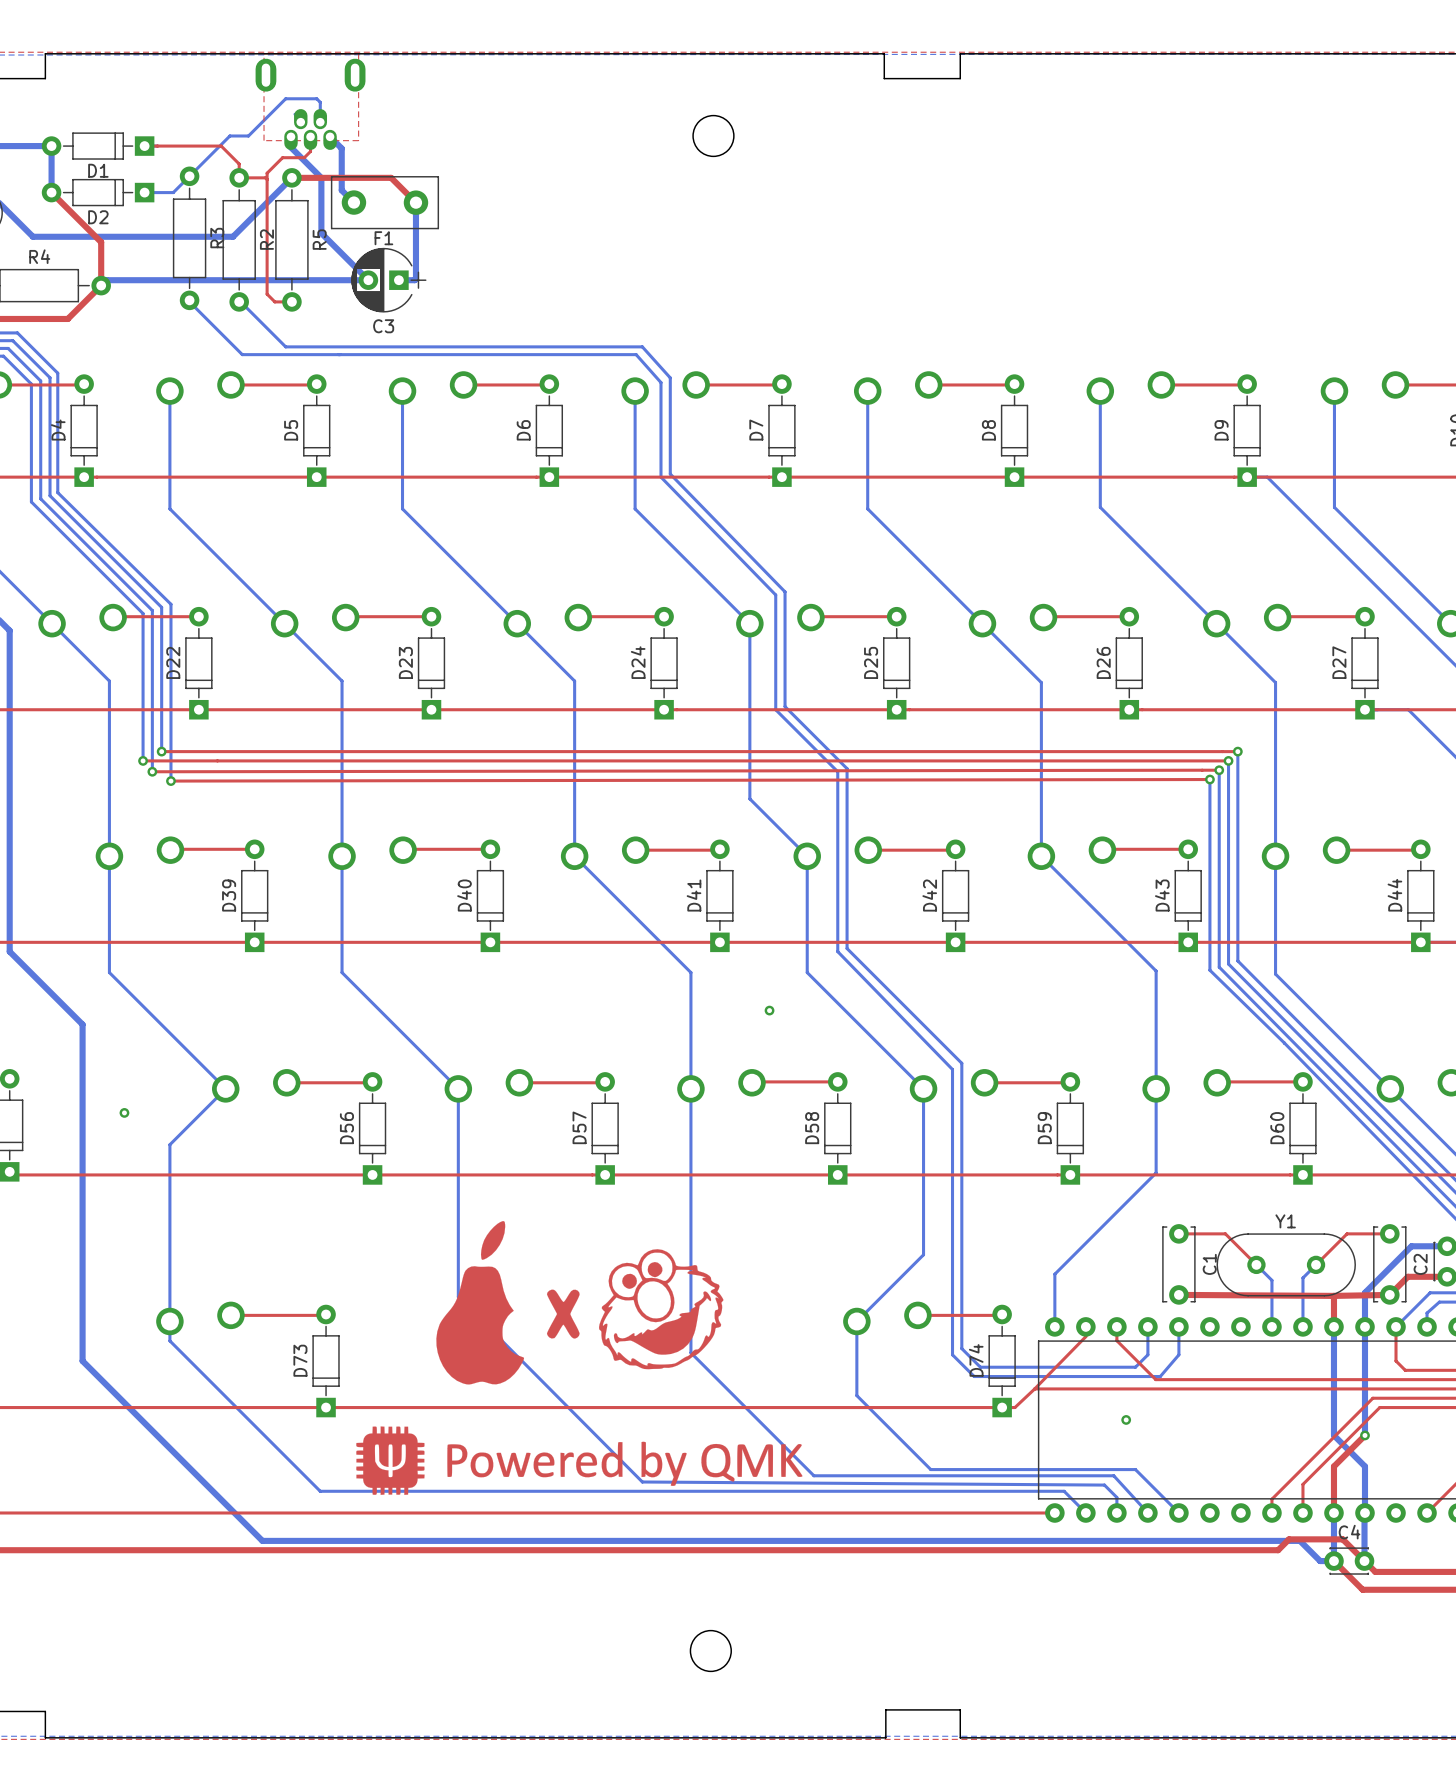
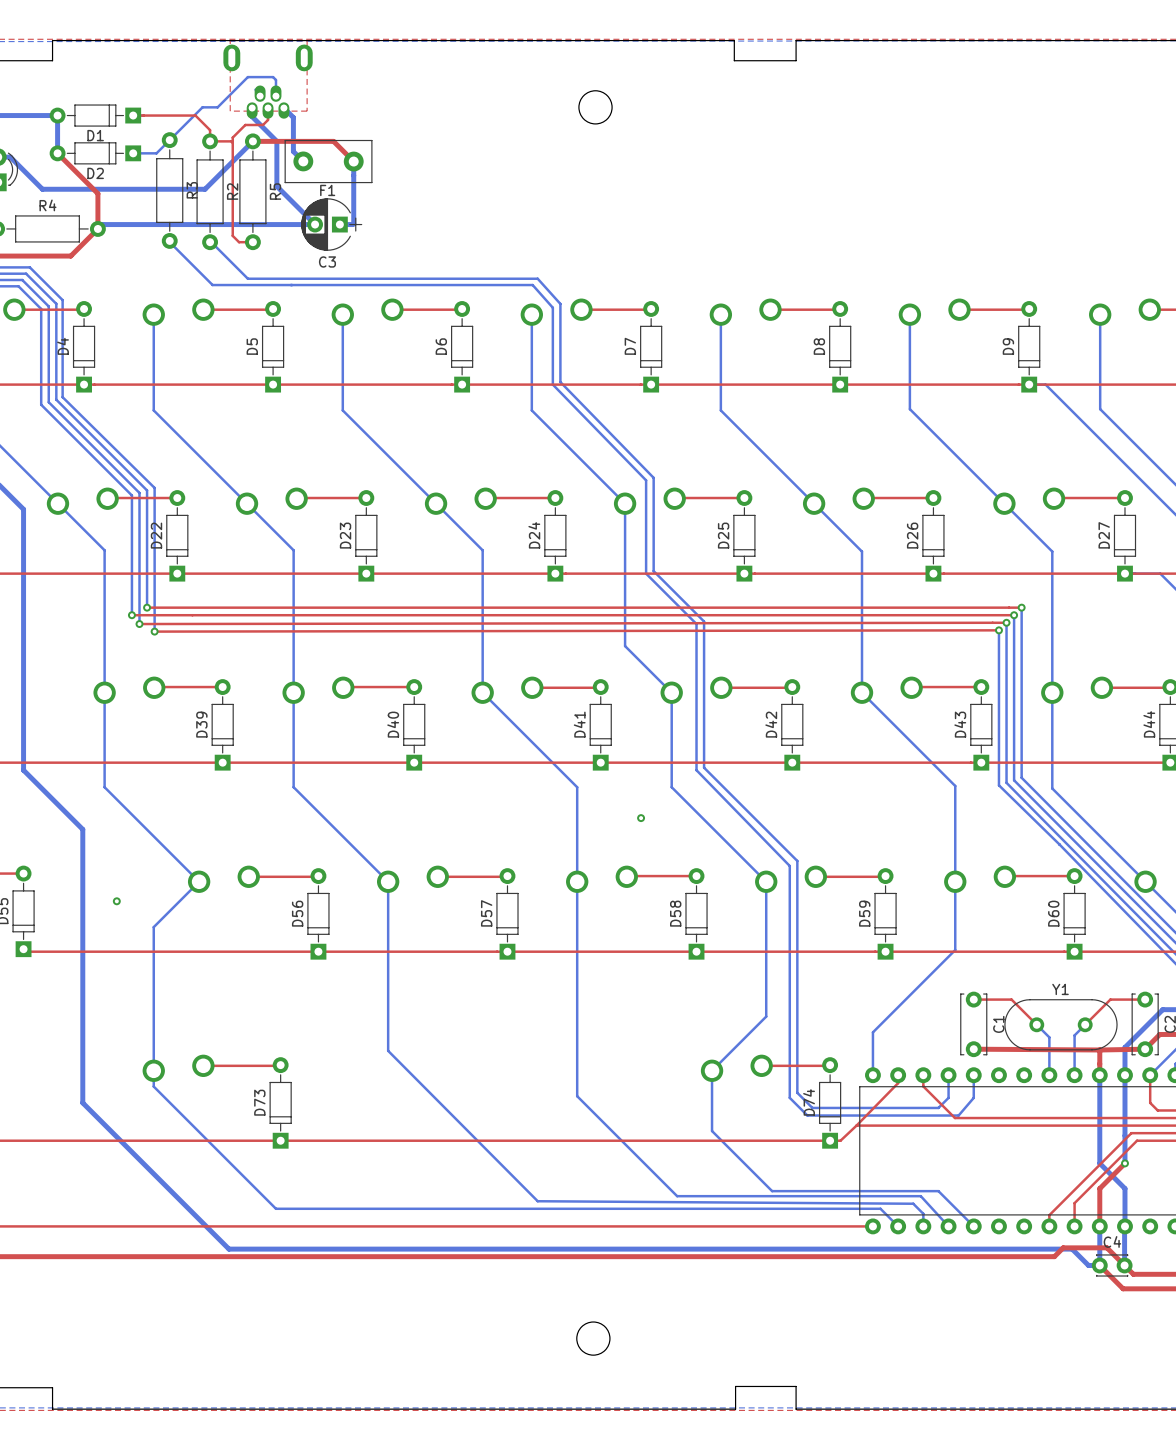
drawing: [436, 1221, 724, 1385] -> none
via: (1126, 1419) -> none
drawing: [356, 1426, 803, 1495] -> none

